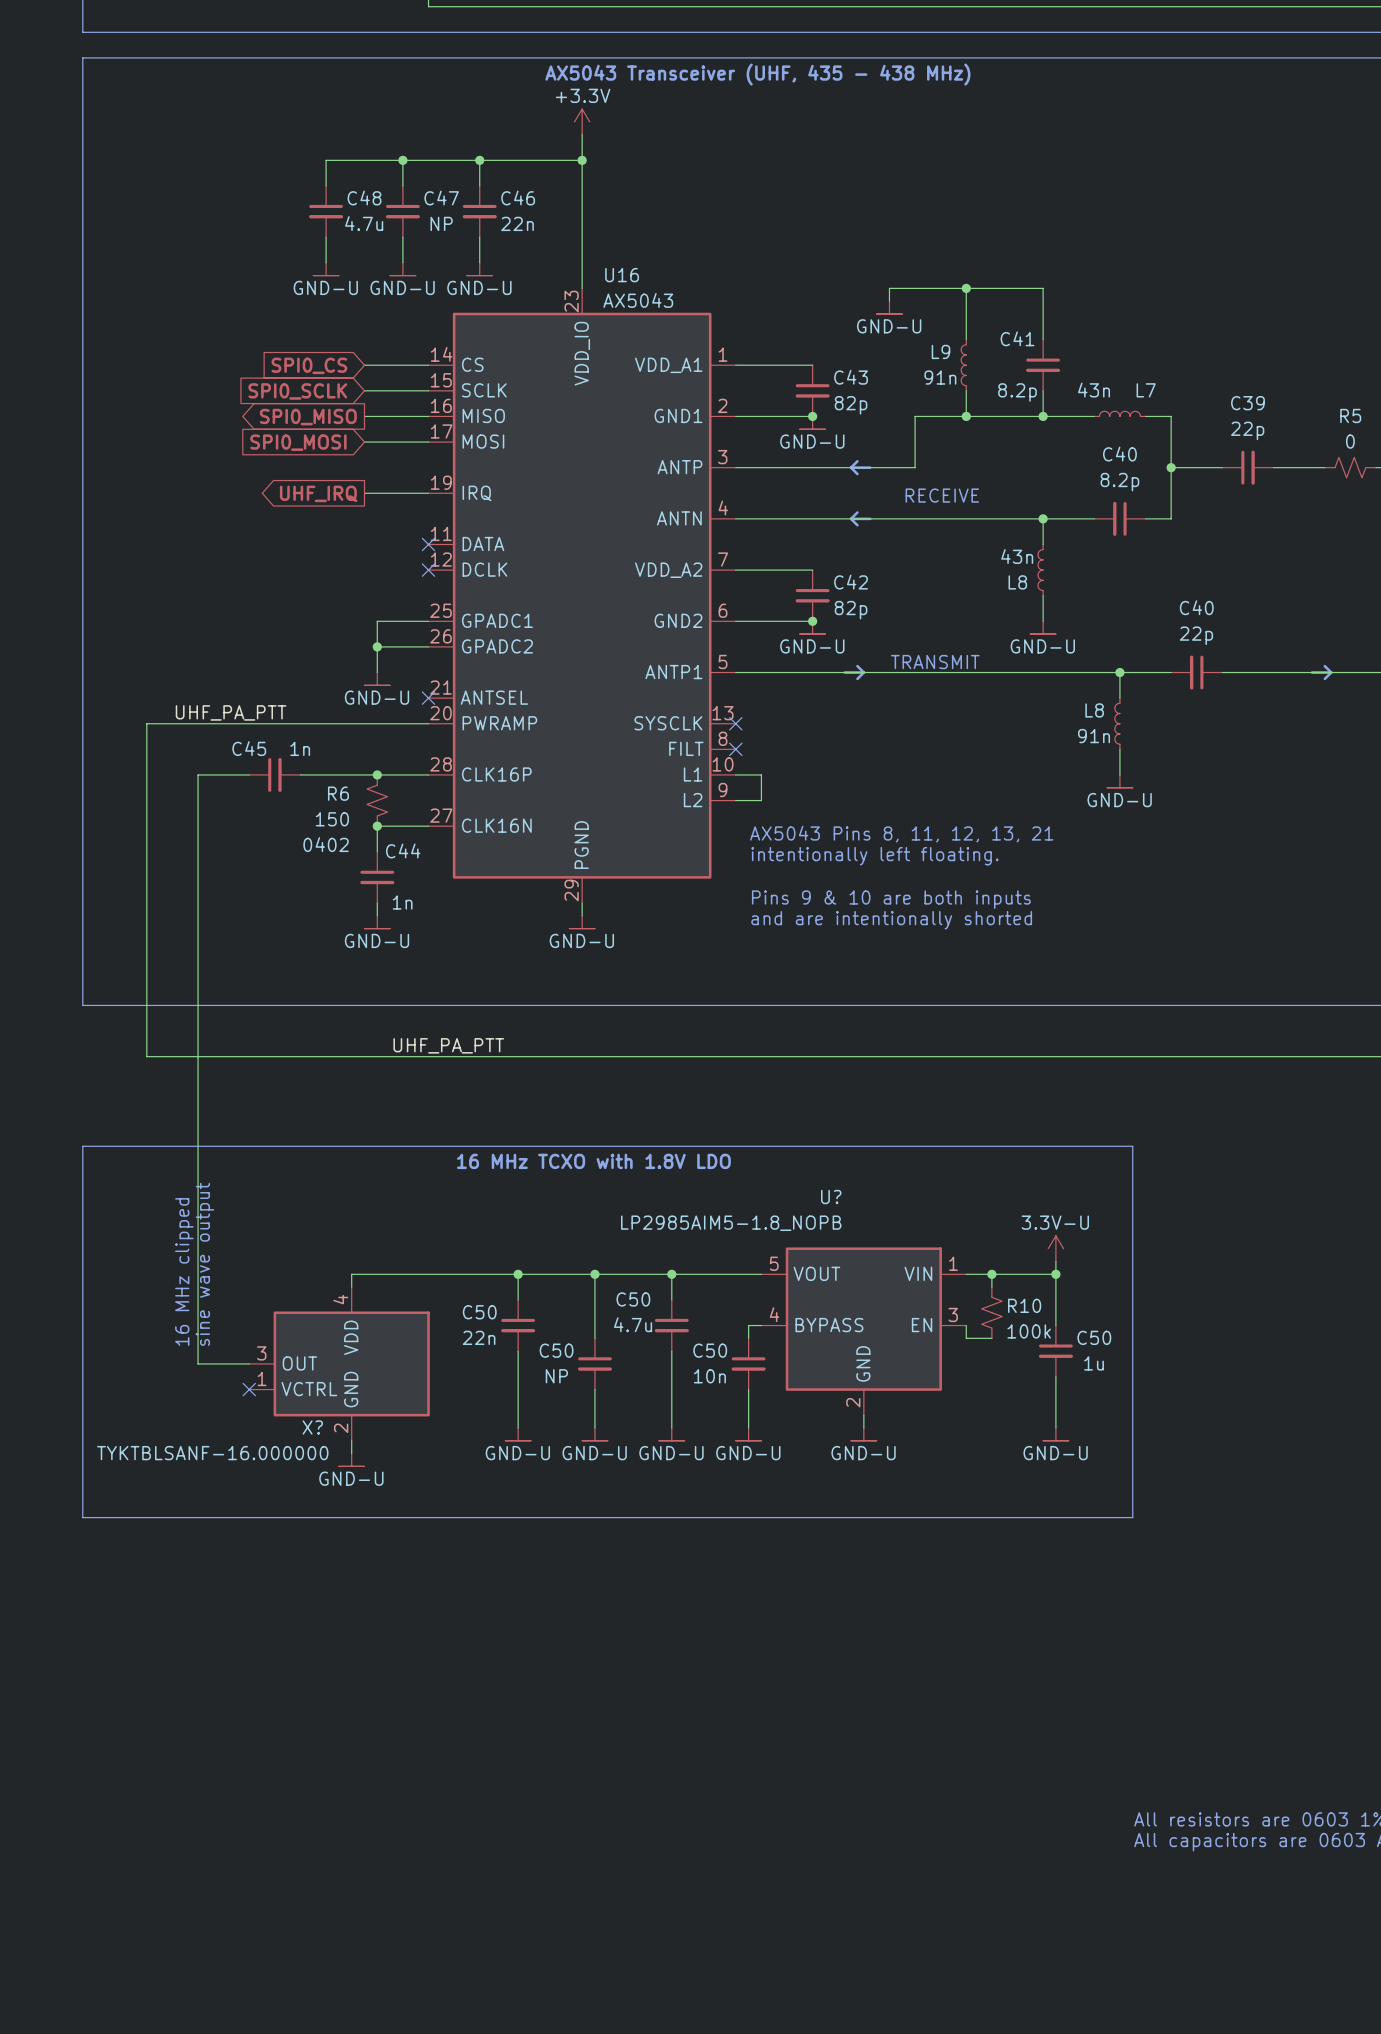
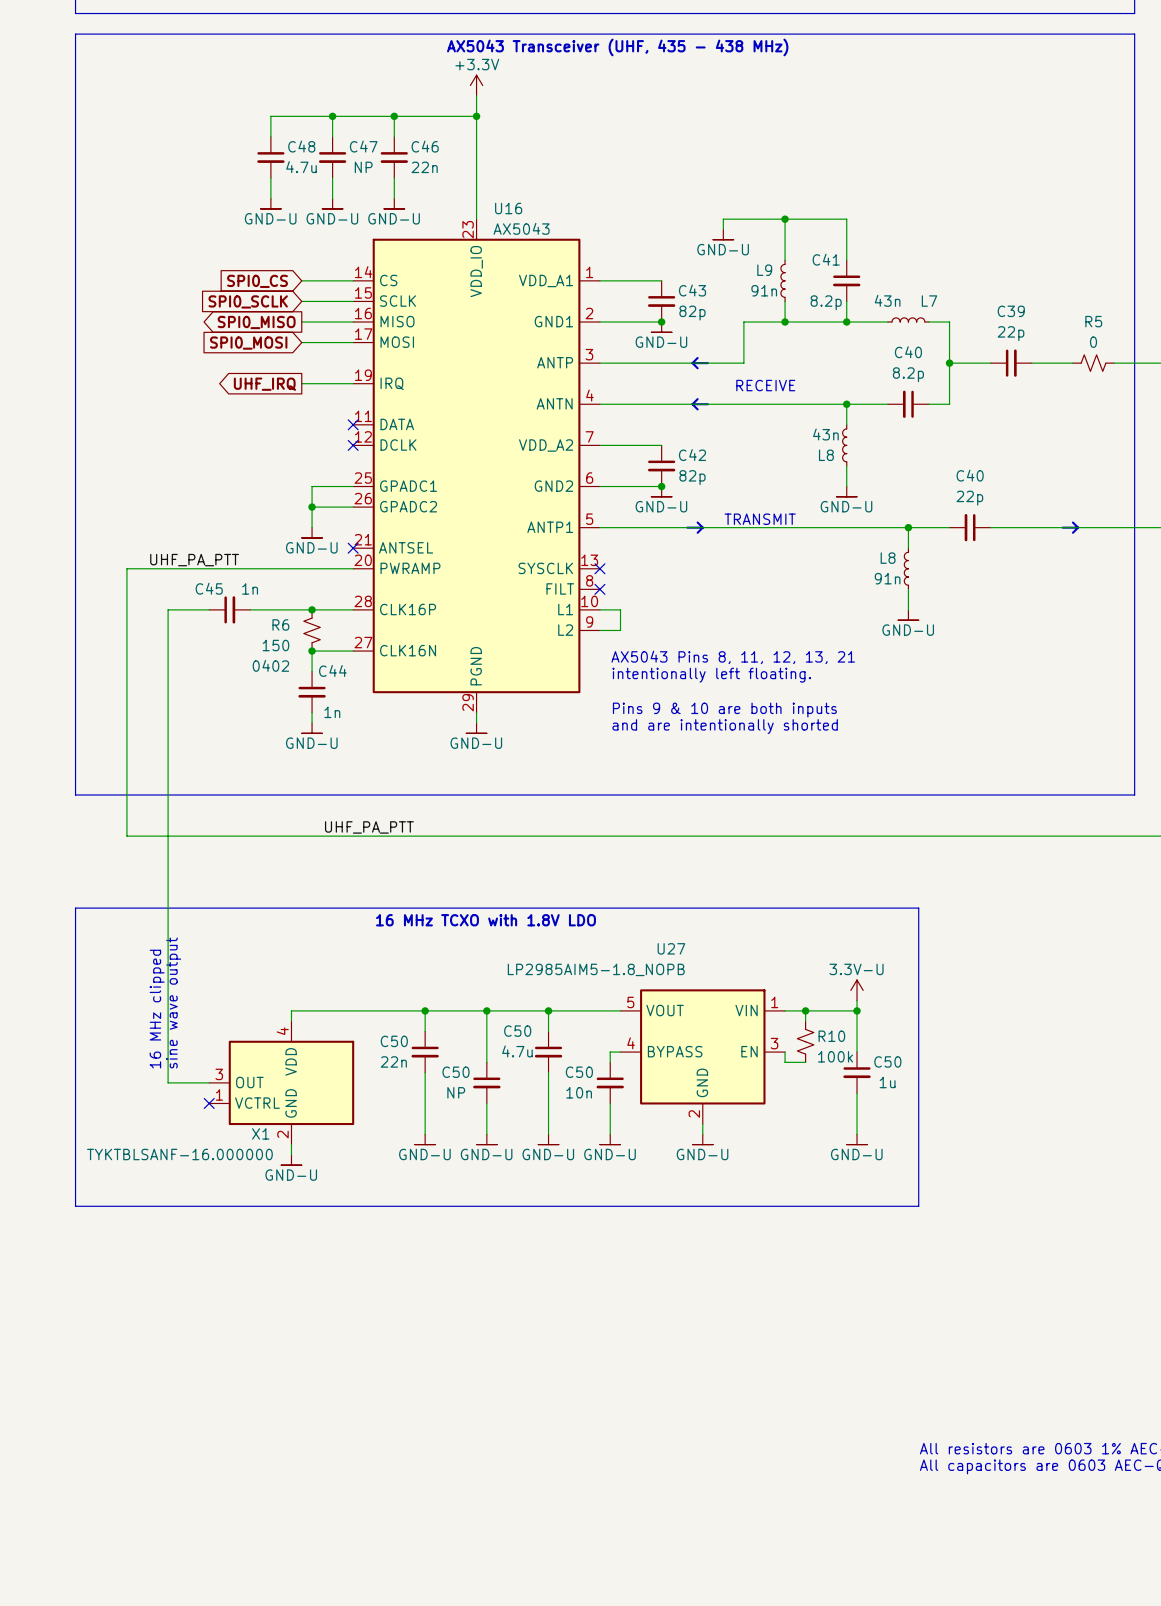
U? name: U? (831, 1197) -> U27 (671, 948)
X? name: X? (312, 1427) -> X1 (260, 1133)

